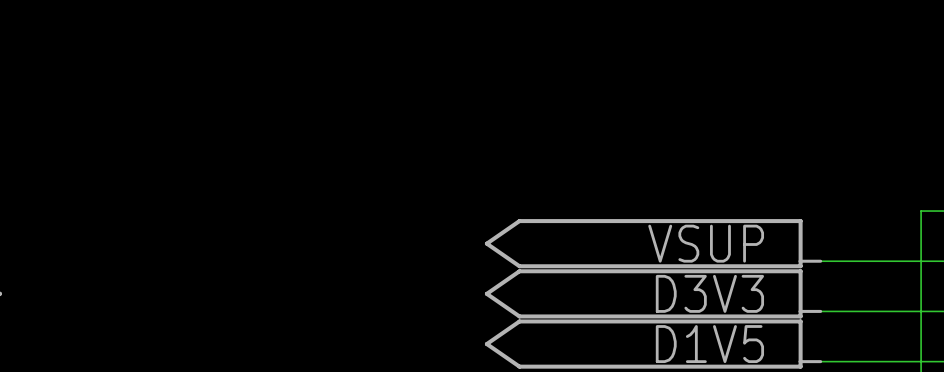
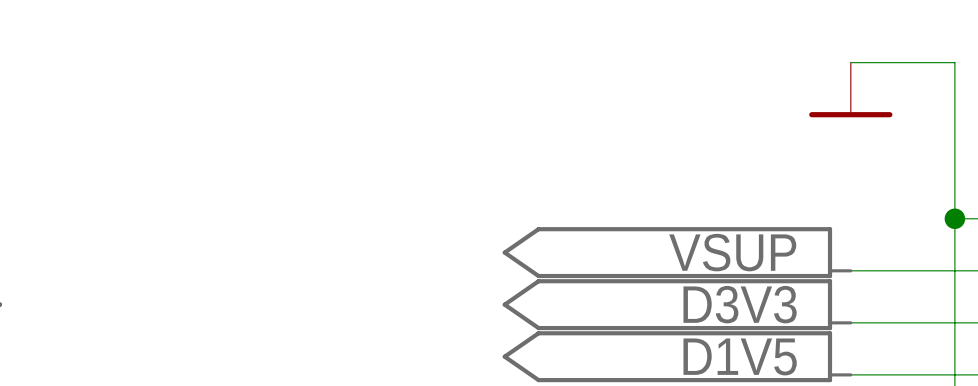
wire: none -> (850, 62) (954, 62) (954, 218)
power symbol: none -> (850, 89)
junction: none -> (954, 218)

